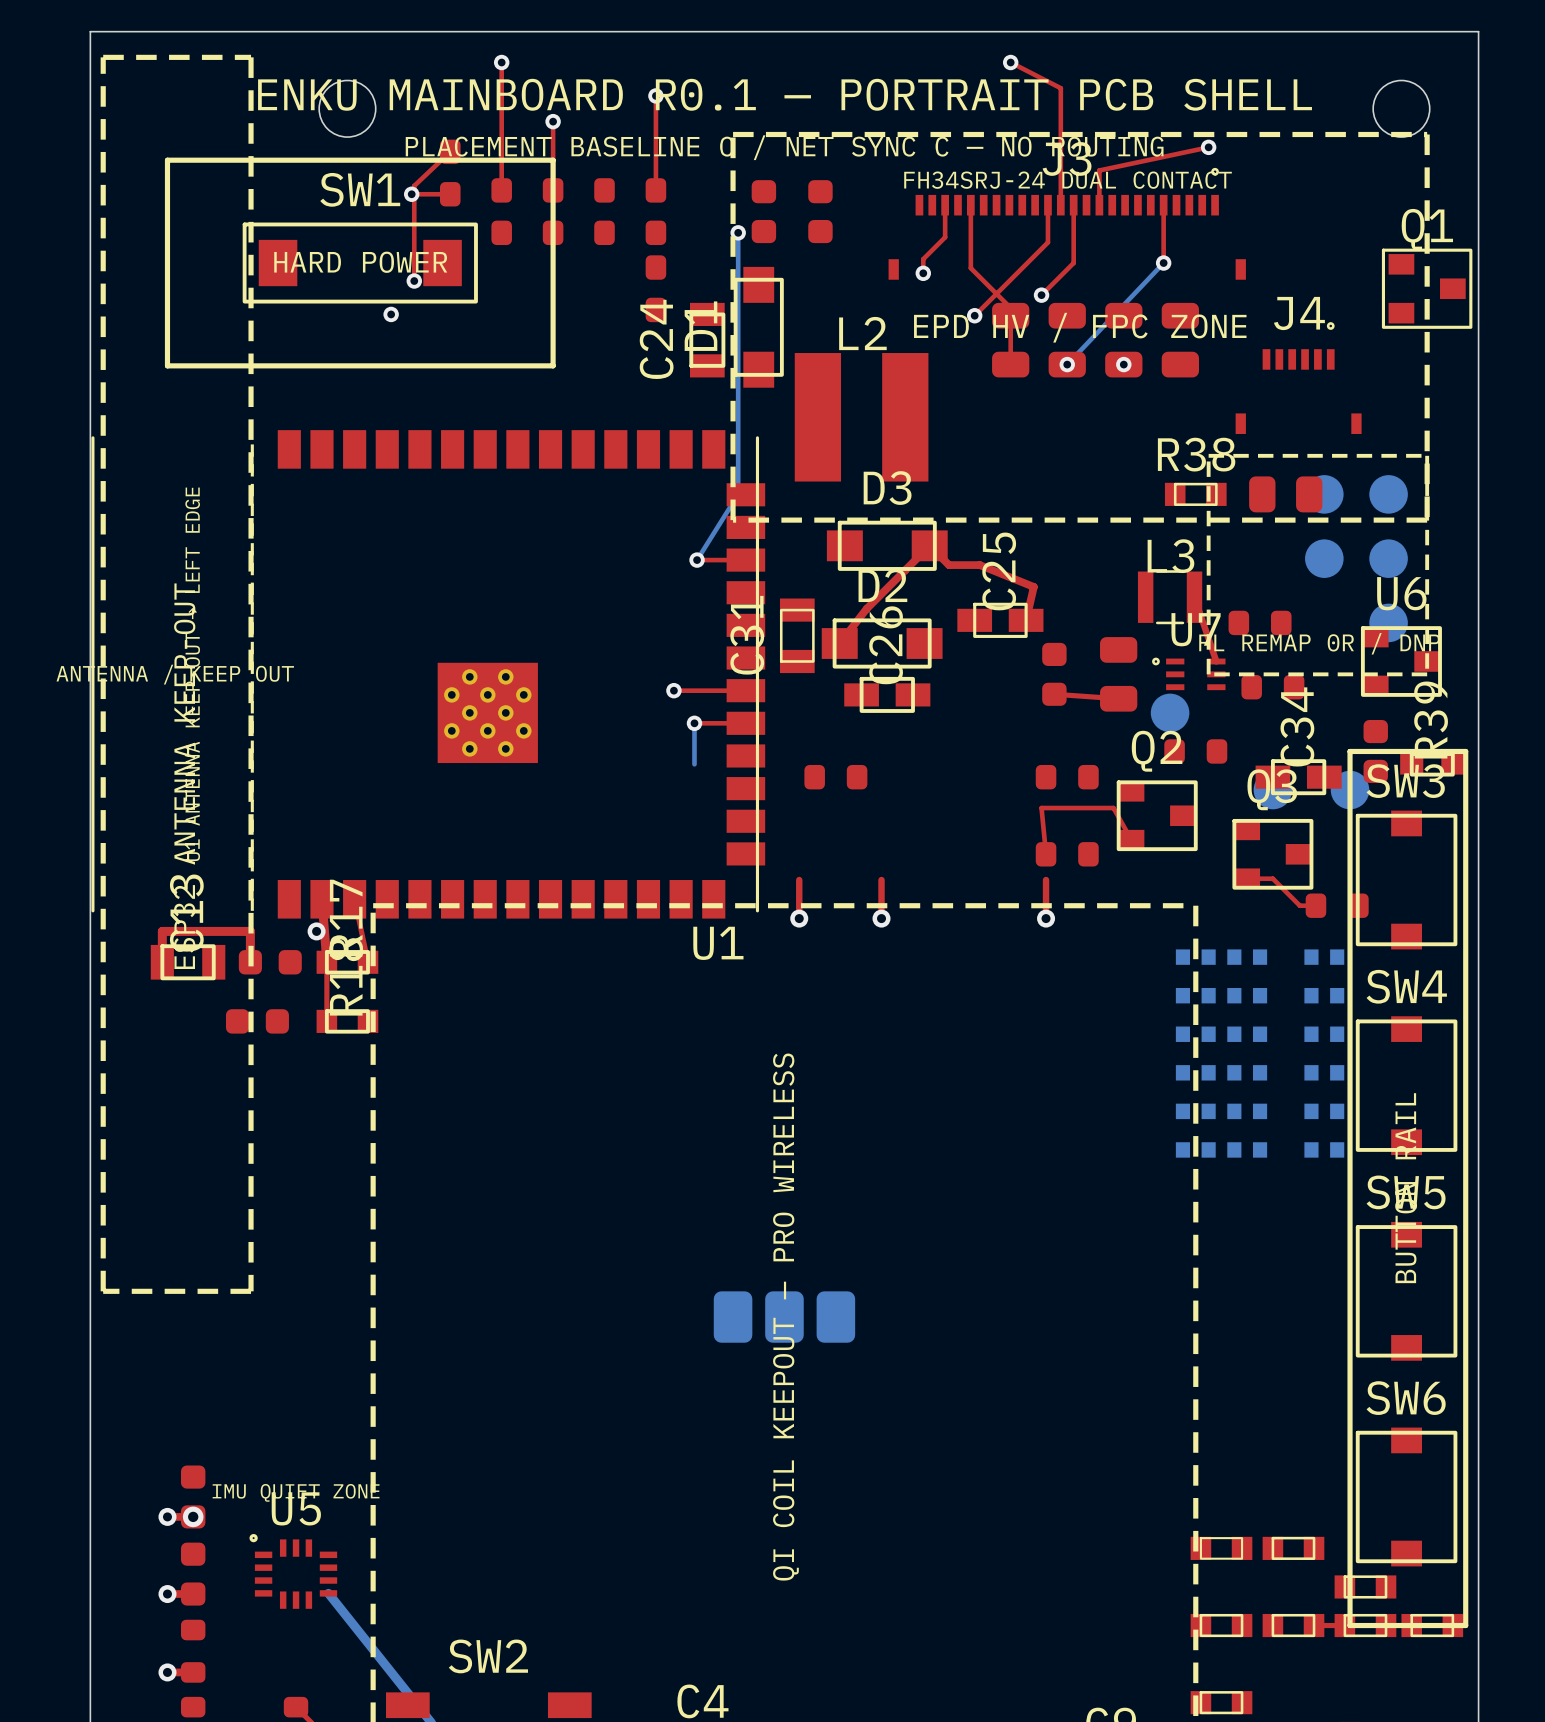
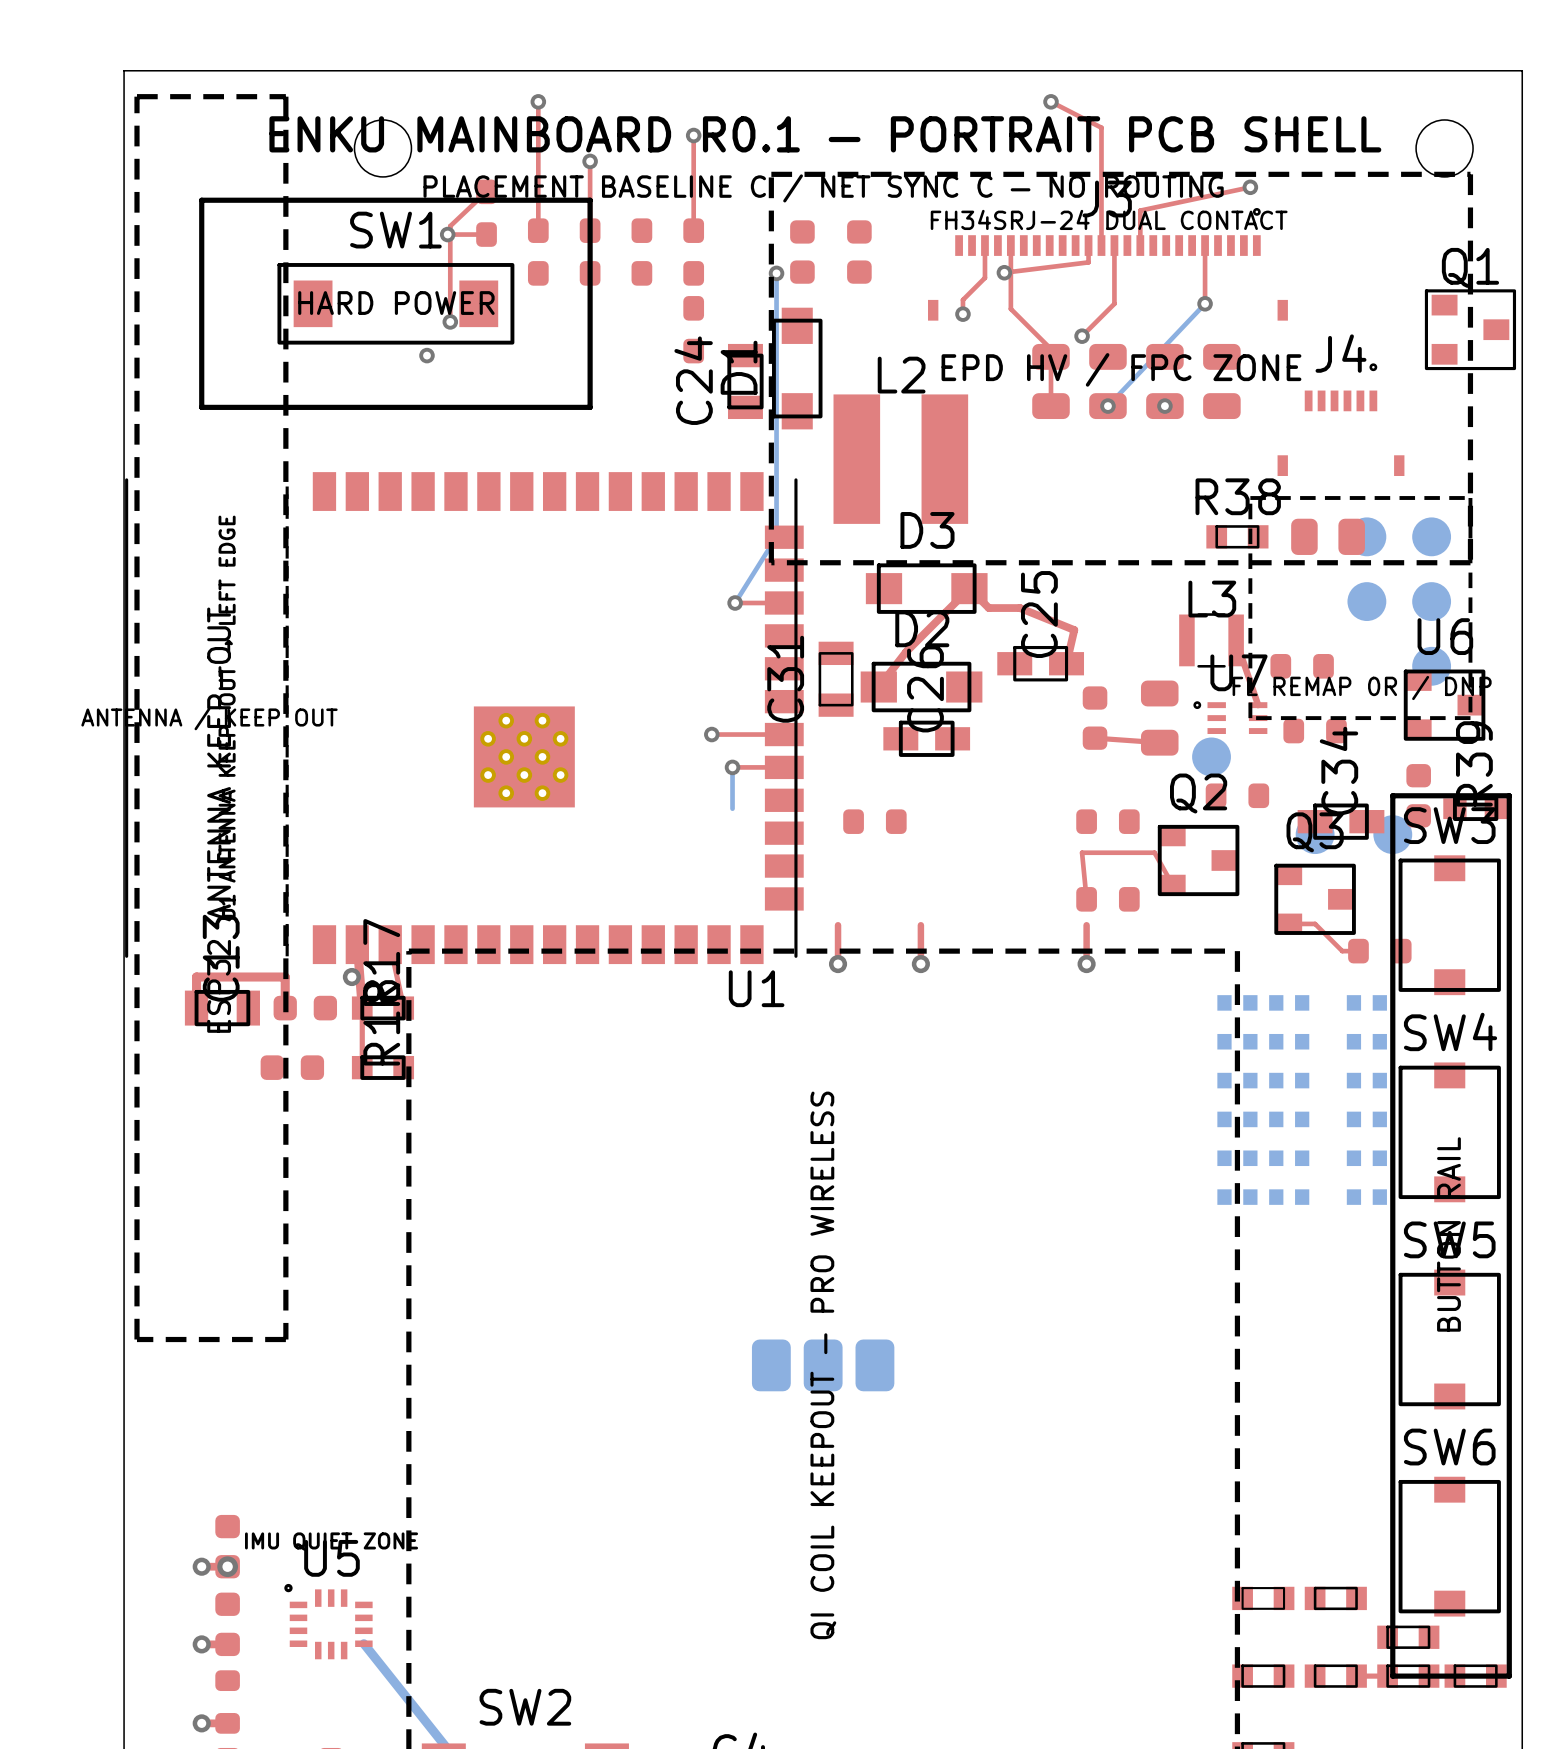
top track: (1047, 221) (1047, 242) (974, 315) -> (1088, 262) (1004, 272)
via position: (974, 315) -> (1004, 272)

